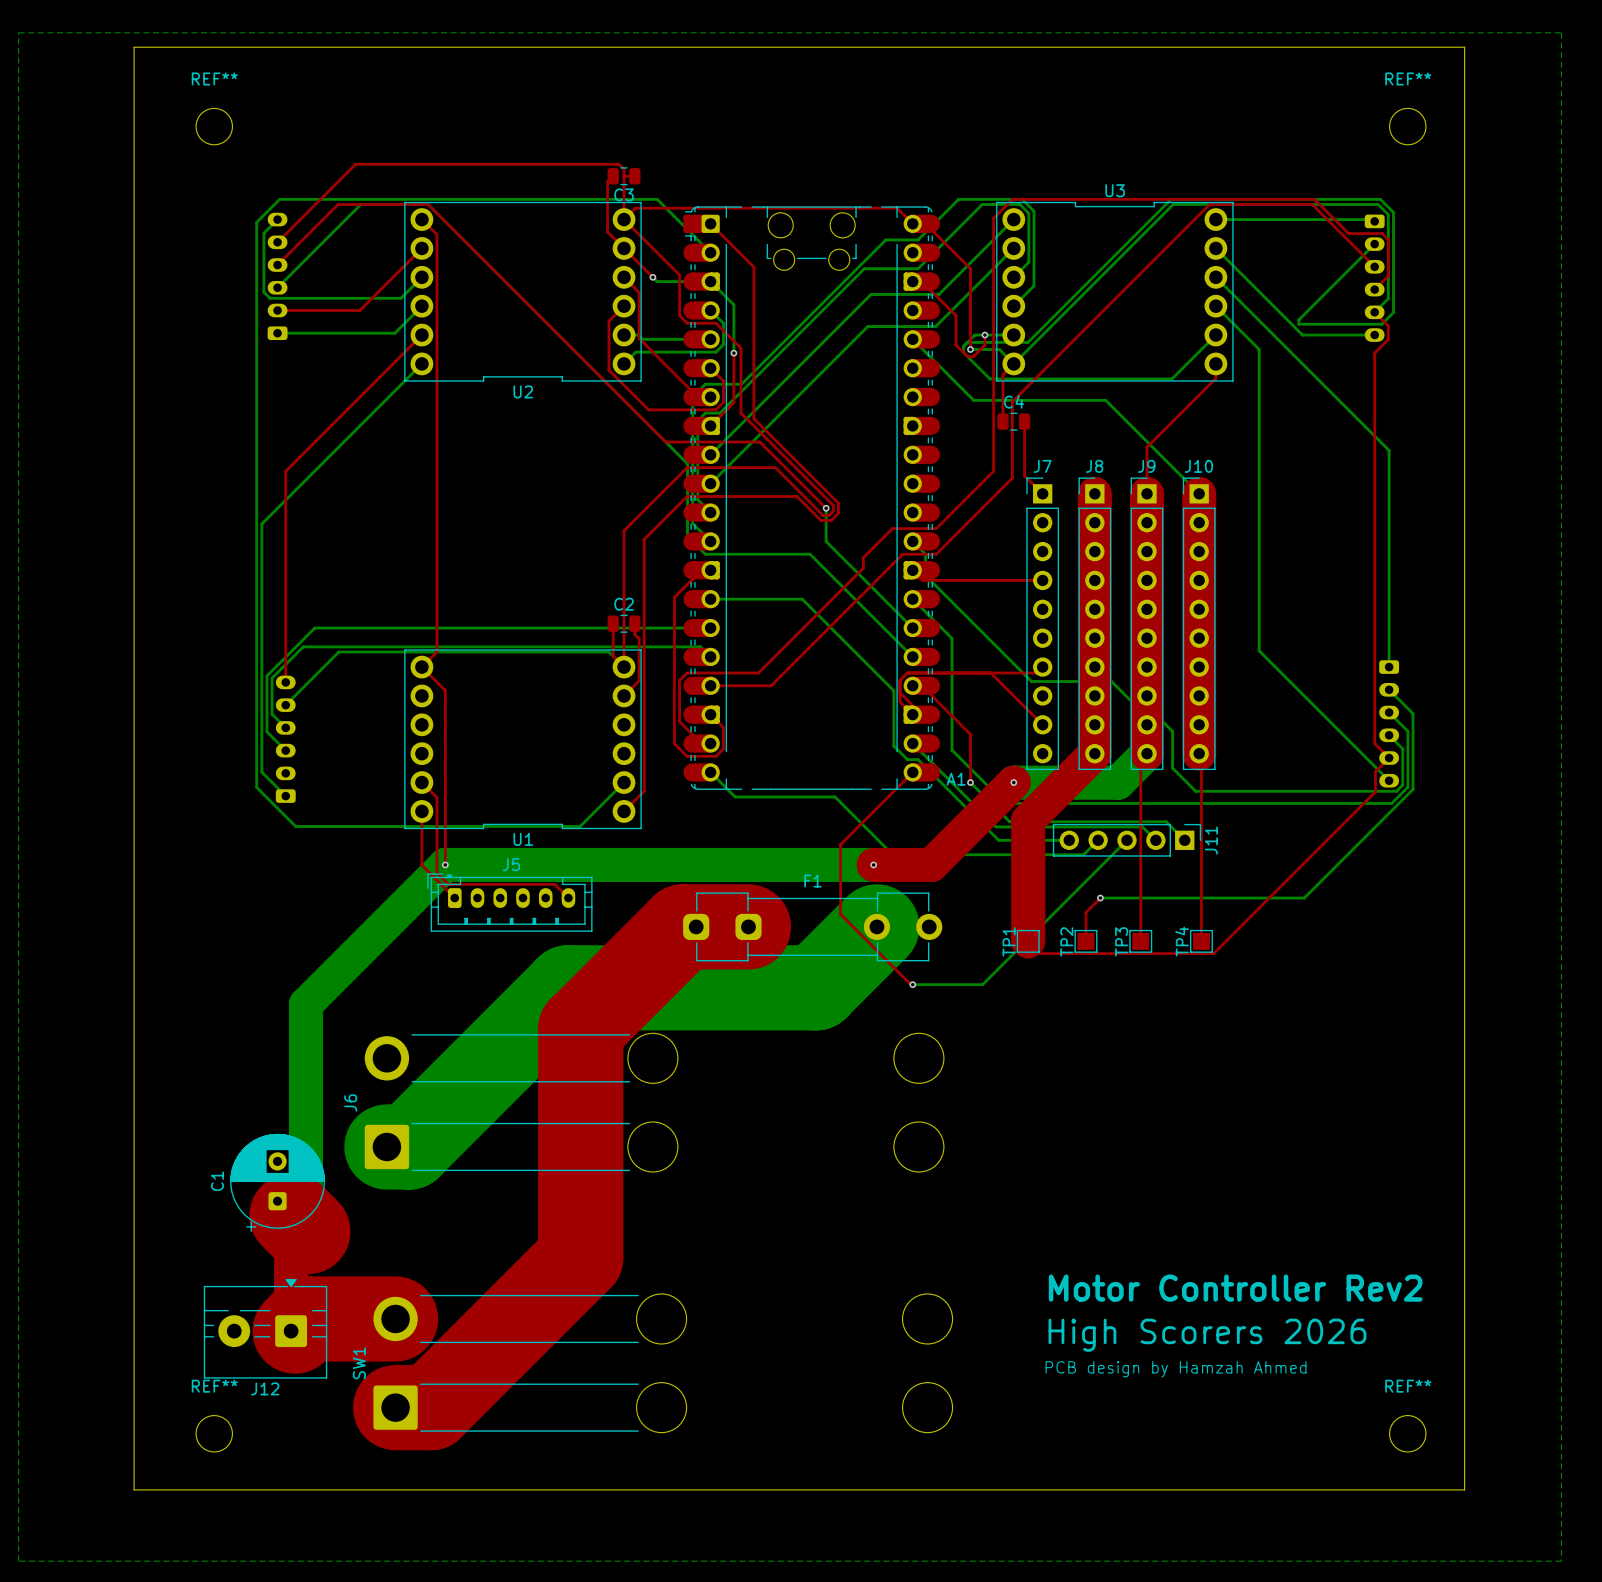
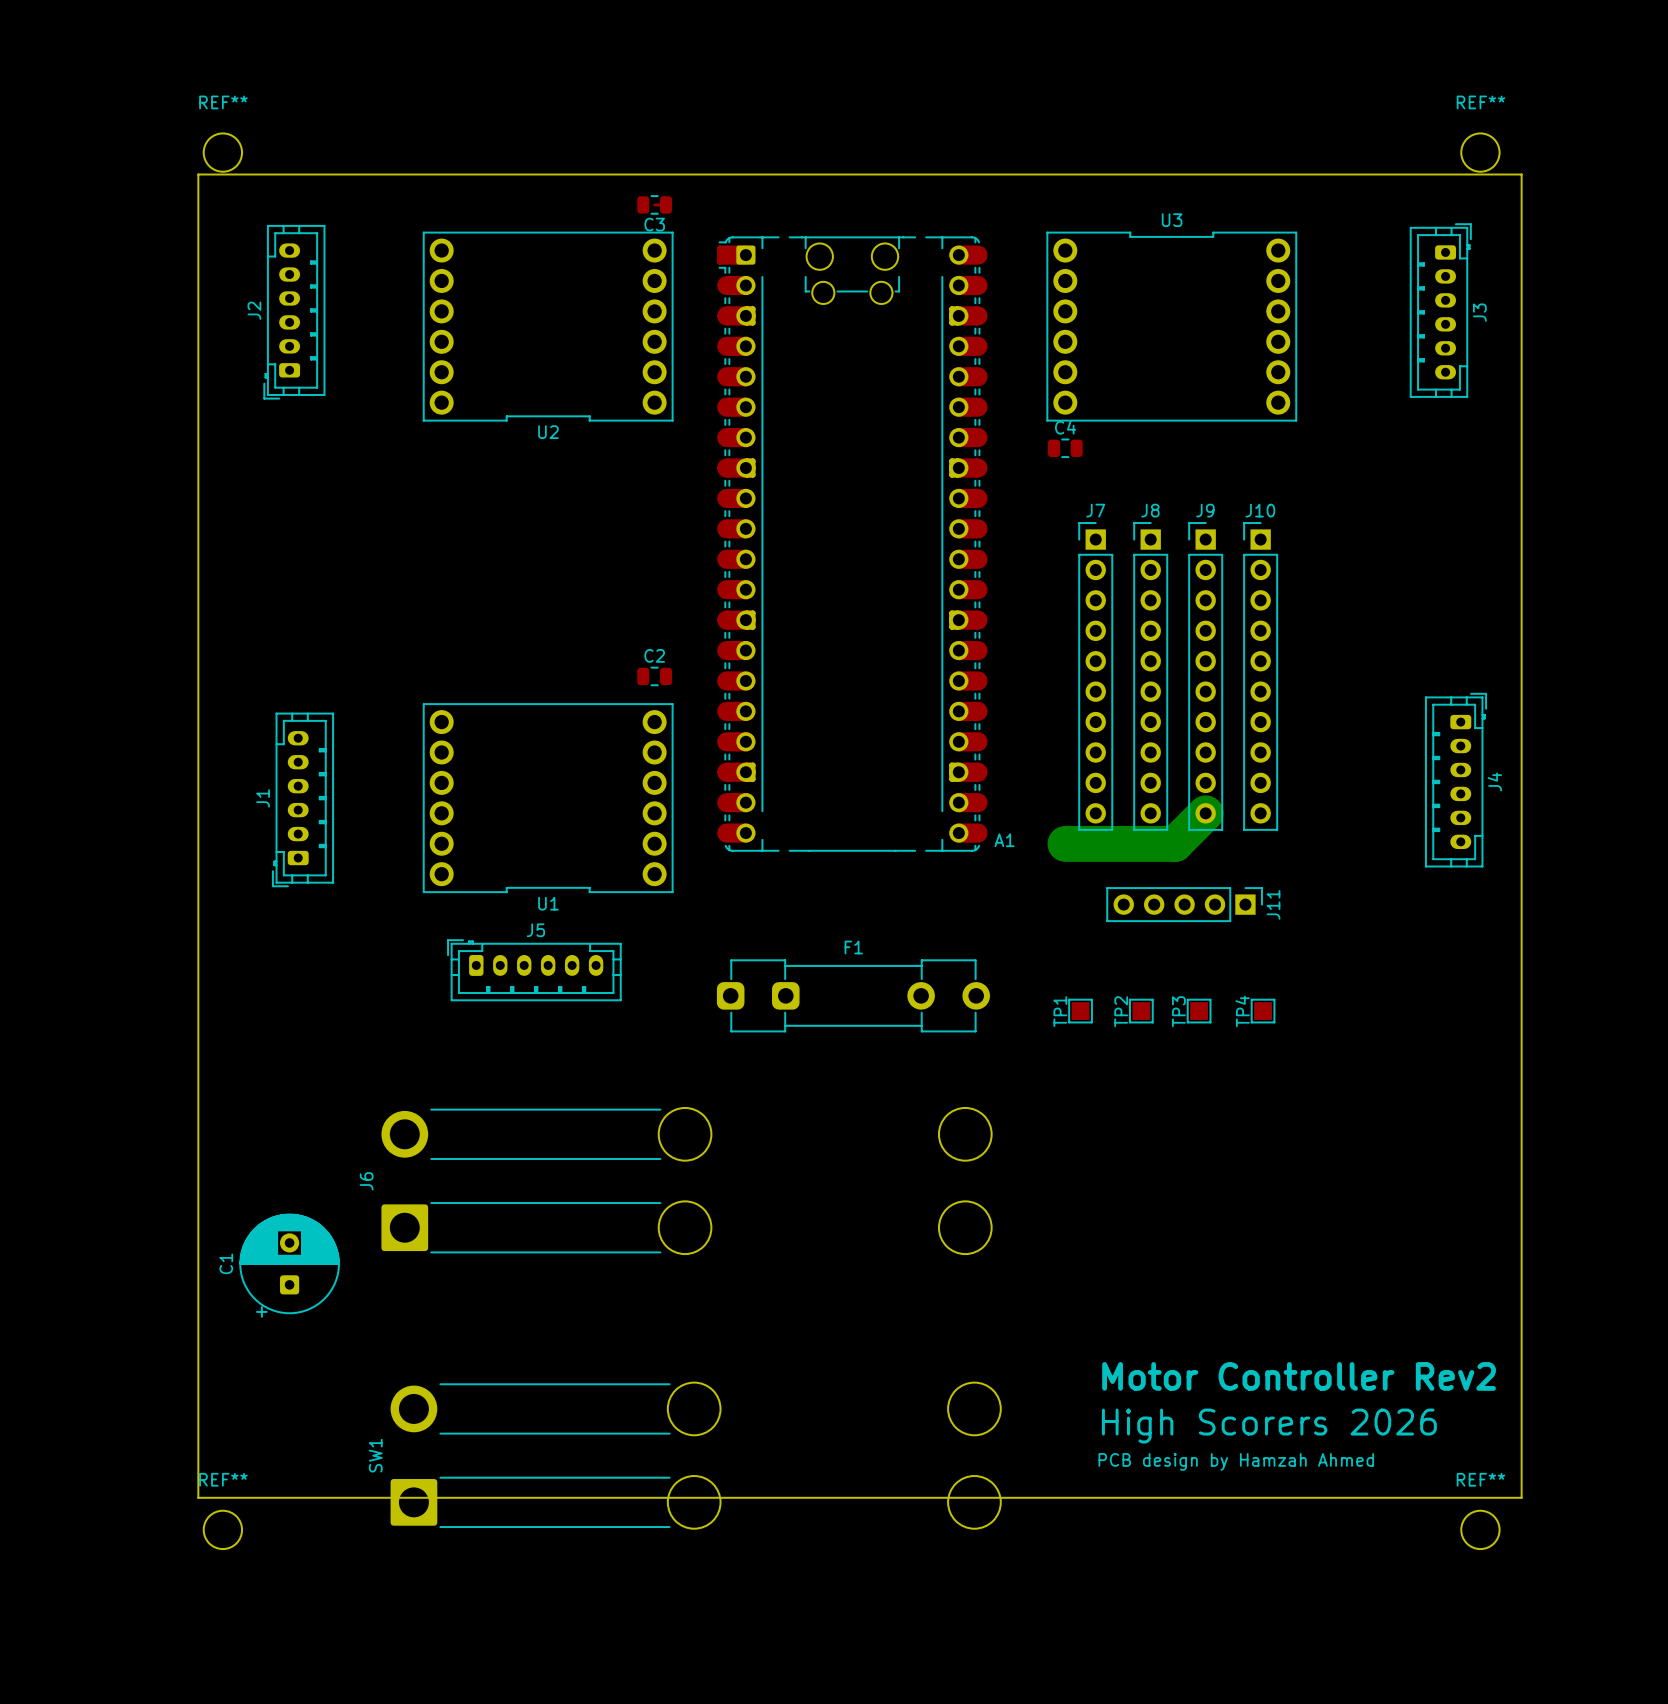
bottom zone outline: (18, 32) (1561, 32) (1561, 1561) (18, 1561) (18, 32) -> none
board edge: (134, 47) (1464, 47) (1464, 1489) (134, 1489) (134, 47) -> (198, 174) (198, 1497) (1521, 1497) (1521, 174) (198, 174)
top track: (613, 176) (607, 181) (607, 231) (652, 277) -> none
bottom track: (277, 219) (263, 233) (263, 292) (270, 298) (400, 298) (421, 277) -> none
top track: (421, 219) (437, 234) (437, 652) (421, 667) (445, 690) (445, 864) -> none
top track: (624, 219) (635, 208) (897, 208) (912, 223) (925, 223) (970, 268) (970, 349) -> none
top track: (624, 219) (679, 275) (679, 315) (687, 323) (715, 323) (741, 348) (741, 413) (833, 505) (833, 511) (829, 515) (823, 515) (775, 467) (687, 467) (624, 530) (624, 667) (613, 656) (613, 623) -> none
top track: (624, 219) (624, 169) (618, 164) (355, 164) (277, 242) -> none
bottom track: (1013, 219) (938, 294) (871, 294) (710, 454) -> none
bottom track: (1215, 219) (1372, 219) (1374, 221) -> none
top track: (710, 223) (753, 267) (753, 418) (838, 503) (838, 513) (831, 520) (821, 520) (797, 496) (687, 496) (644, 539) (644, 791) (624, 811) -> none
bottom track: (1374, 244) (1298, 319) (1298, 324) (1381, 324) (1393, 312) (1393, 212) (1380, 199) (1171, 199) (1028, 342) (967, 342) -> none
top track: (421, 248) (359, 310) (277, 310) -> none
bottom track: (1013, 248) (935, 326) (867, 326) (710, 483) -> none
bottom track: (1215, 248) (1302, 335) (1374, 335) -> none
bottom track: (710, 252) (657, 199) (279, 199) (256, 222) (256, 787) (295, 826) (580, 826) (624, 782) -> none
top track: (277, 265) (338, 204) (428, 204) (665, 442) (759, 442) (826, 508) -> none
top track: (1374, 266) (1312, 204) (1209, 204) (1012, 401) (1012, 478) (936, 554) (902, 554) (771, 685) (710, 685) -> none
J2 side: bottom (277, 276) -> top (294, 312)
top track: (624, 277) (639, 292) (639, 338) (697, 397) (710, 397) -> none
bottom track: (652, 277) (657, 281) (710, 281) (733, 304) (733, 353) -> none
via: (652, 277) -> none
bottom track: (1013, 277) (1028, 262) (1028, 213) (1020, 204) (982, 204) (918, 268) (864, 268) (719, 413) (705, 413) (697, 420) (697, 499) (710, 512) -> none
bottom track: (1215, 277) (1389, 450) (1389, 667) -> none
J3 side: bottom (1374, 278) -> top (1440, 310)
top track: (912, 281) (921, 281) (956, 315) (956, 345) (967, 356) (973, 356) (984, 345) (984, 335) -> none
bottom track: (277, 287) (360, 204) (428, 204) (687, 463) (687, 536) (705, 554) (810, 554) (912, 656) -> none
top track: (1374, 289) (1388, 275) (1388, 239) (1382, 233) (1348, 233) (1314, 199) (1012, 199) (993, 218) (993, 471) (936, 528) (892, 528) (863, 557) (863, 568) (758, 673) (687, 673) (679, 680) (679, 721) (701, 743) -> none
bottom track: (421, 306) (394, 333) (277, 333) -> none
top track: (624, 306) (608, 321) (608, 370) (648, 409) (715, 409) (723, 402) (723, 381) (710, 368) -> none
bottom track: (1013, 306) (1034, 285) (1034, 211) (1022, 199) (958, 199) (918, 239) (885, 239) (741, 384) (705, 384) (692, 396) (692, 523) (710, 541) -> none
bottom track: (1215, 306) (1259, 349) (1259, 650) (1389, 780) -> none
bottom track: (710, 310) (723, 323) (723, 344) (715, 352) (635, 352) (624, 363) -> none
top track: (1374, 312) (1388, 325) (1388, 339) (1374, 353) (1374, 743) (1389, 758) (1375, 771) (1375, 791) (1213, 953) (1040, 953) (1028, 941) (1028, 820) (1094, 753) (1094, 493) -> none
bottom track: (1374, 312) (1388, 298) (1388, 214) (1378, 204) (1173, 204) (1013, 363) (999, 349) (970, 349) -> none
top track: (421, 335) (285, 471) (285, 682) -> none
bottom track: (624, 335) (638, 335) (642, 339) (710, 339) -> none
via: (984, 335) -> none
bottom track: (1013, 335) (974, 335) (963, 346) (963, 352) (989, 378) (1171, 378) (1215, 335) -> none
bottom track: (912, 339) (973, 400) (1105, 400) (1199, 493) -> none
via: (970, 349) -> none
top track: (733, 353) (733, 402) (710, 425) -> none
via: (733, 353) -> none
bottom track: (421, 363) (261, 524) (261, 772) (285, 796) -> none
top track: (1013, 363) (1003, 374) (1003, 421) -> none
top track: (1215, 363) (1215, 378) (1147, 447) (1147, 753) (1140, 759) (1140, 941) -> none
C4 position: (1013, 421) -> (1065, 448)
top track: (1024, 421) (1024, 475) (1042, 493) -> none
top track: (1199, 493) (1201, 941) -> none
bottom track: (826, 508) (826, 541) (912, 628) -> none
via: (826, 508) -> none
bottom track: (912, 541) (925, 554) (925, 575) (1031, 681) (1111, 681) (1141, 711) (1152, 711) (1172, 731) (1172, 768) (1195, 791) (1396, 791) (1402, 785) (1402, 748) (1389, 735) -> none
top track: (710, 570) (701, 570) (674, 597) (674, 743) (687, 756) (715, 756) (723, 748) (723, 727) (710, 714) -> none
top track: (912, 570) (922, 580) (1042, 580) -> none
bottom track: (710, 599) (802, 599) (893, 690) (893, 746) (907, 759) (918, 759) (998, 840) (1069, 840) -> none
bottom track: (912, 599) (952, 638) (952, 750) (1005, 803) (1391, 803) (1407, 787) (1407, 731) (1389, 712) -> none
top track: (634, 623) (634, 634) (639, 638) (639, 680) (624, 695) -> none
bottom track: (710, 628) (314, 628) (266, 675) (266, 731) (285, 750) -> none
bottom track: (710, 656) (700, 646) (303, 646) (272, 678) (272, 714) (285, 727) -> none
bottom track: (624, 667) (608, 652) (338, 652) (285, 705) -> none
top track: (1042, 667) (1036, 673) (907, 673) (899, 680) (899, 701) (912, 714) -> none
top track: (990, 673) (1042, 724) -> none
top track: (921, 685) (970, 734) (970, 782) -> none
bottom track: (1389, 689) (1413, 713) (1413, 789) (1304, 898) (1100, 898) -> none
top track: (899, 692) (921, 714) -> none
J4 side: bottom (1389, 723) -> top (1455, 780)
J1 side: bottom (285, 739) -> top (303, 799)
bottom track: (912, 743) (996, 826) (1142, 826) (1155, 840) -> none
bottom track: (710, 772) (735, 797) (835, 797) (892, 854) (1083, 854) (1098, 840) -> none
top track: (912, 772) (840, 844) (840, 914) (912, 984) -> none
top track: (421, 782) (437, 797) (437, 873) (448, 884) (554, 884) (568, 898) -> none
bottom track: (970, 782) (1009, 821) (1166, 821) (1184, 840) -> none
via: (970, 782) -> none
top track: (1013, 782) (931, 864) (873, 864) -> none
via: (1013, 782) -> none
top track: (421, 811) (421, 865) (454, 898) -> none
bottom track: (1127, 840) (982, 984) (912, 984) -> none
via: (445, 864) -> none
bottom track: (873, 864) (445, 864) (306, 1004) (306, 1187) (292, 1201) (277, 1201) -> none
via: (873, 864) -> none
top track: (1100, 898) (1085, 912) (1085, 941) -> none
via: (1100, 898) -> none
top track: (748, 926) (683, 926) (580, 1029) (580, 1257) (430, 1407) (395, 1407) -> none
bottom track: (876, 926) (816, 987) (568, 987) (409, 1146) (386, 1146) -> none
via: (912, 984) -> none
top track: (292, 1215) (307, 1231) (291, 1248) (291, 1331) -> none
top track: (395, 1318) (307, 1318) (295, 1331) -> none
J12: (265, 1328) -> none

